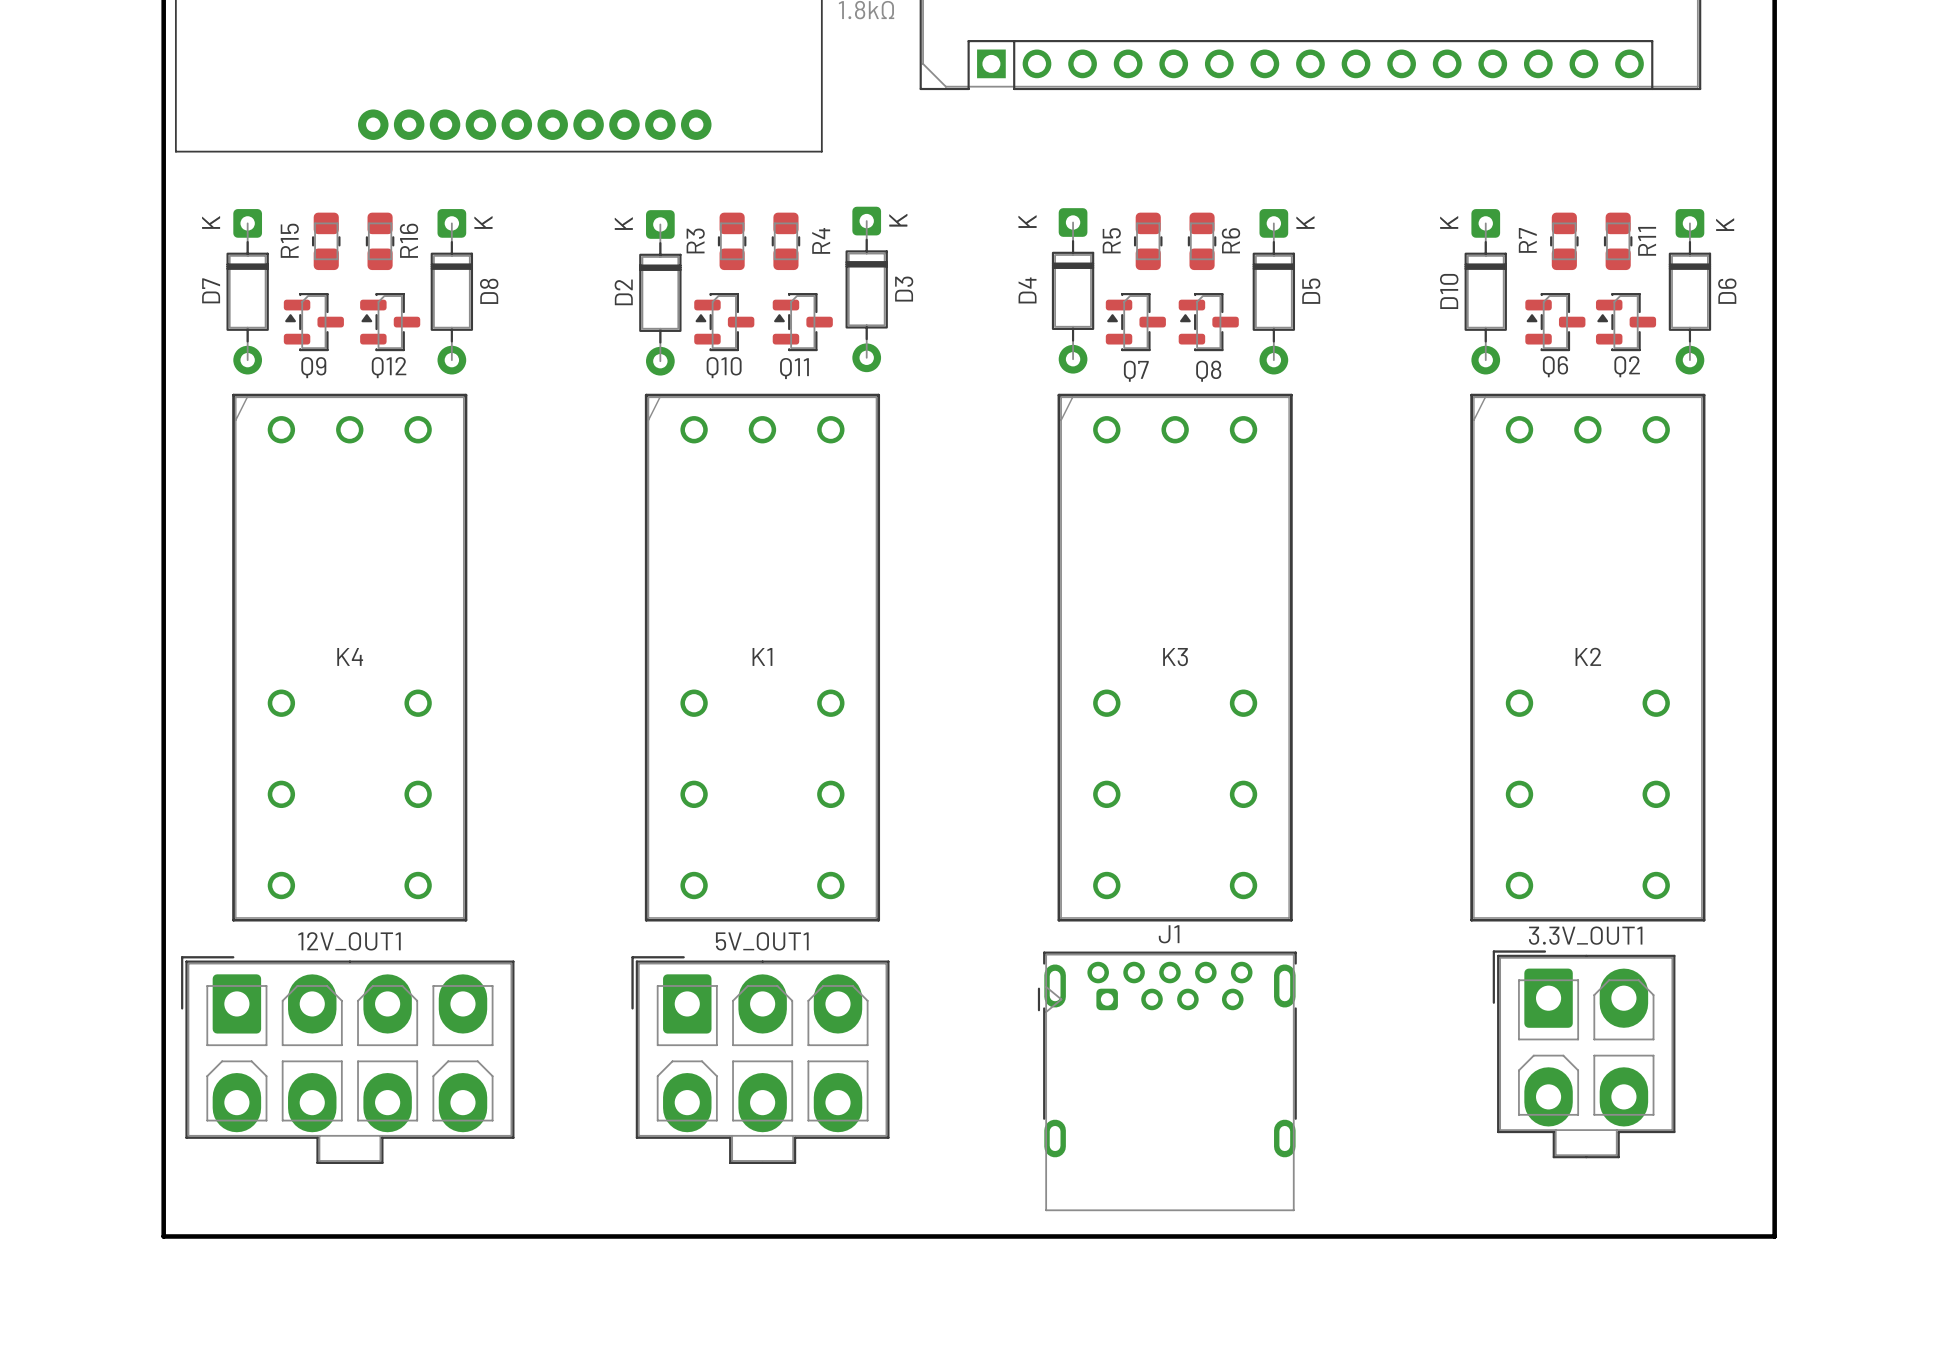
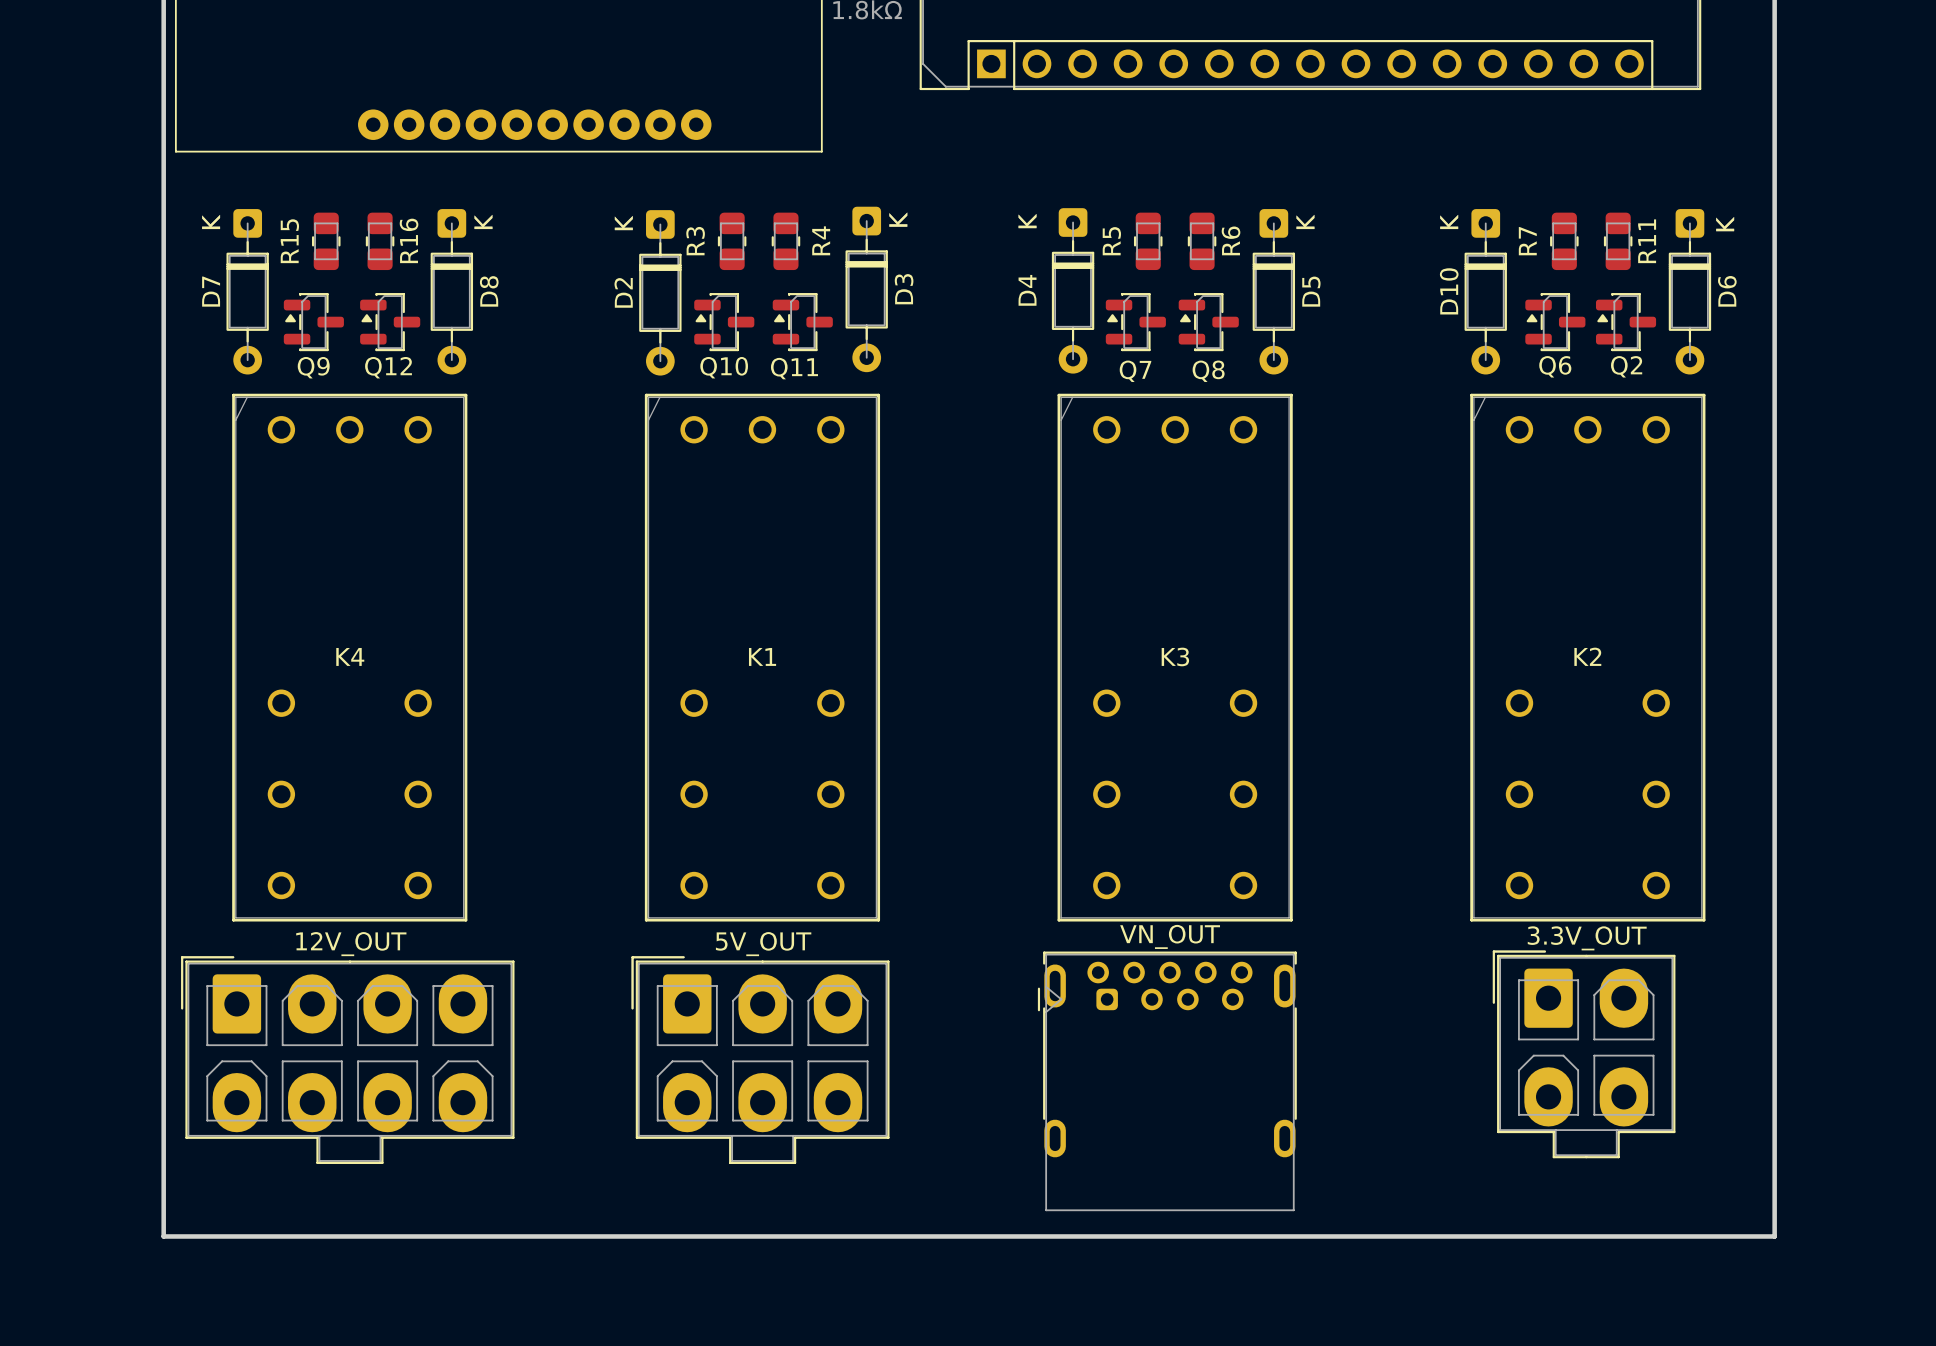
J1 name: J1 (1169, 934) -> VN_OUT (1170, 936)
3.3V_OUT1 name: 3.3V_OUT1 (1585, 935) -> 3.3V_OUT (1587, 938)
12V_OUT1 name: 12V_OUT1 (349, 941) -> 12V_OUT (351, 944)
5V_OUT1 name: 5V_OUT1 (762, 941) -> 5V_OUT (763, 944)

